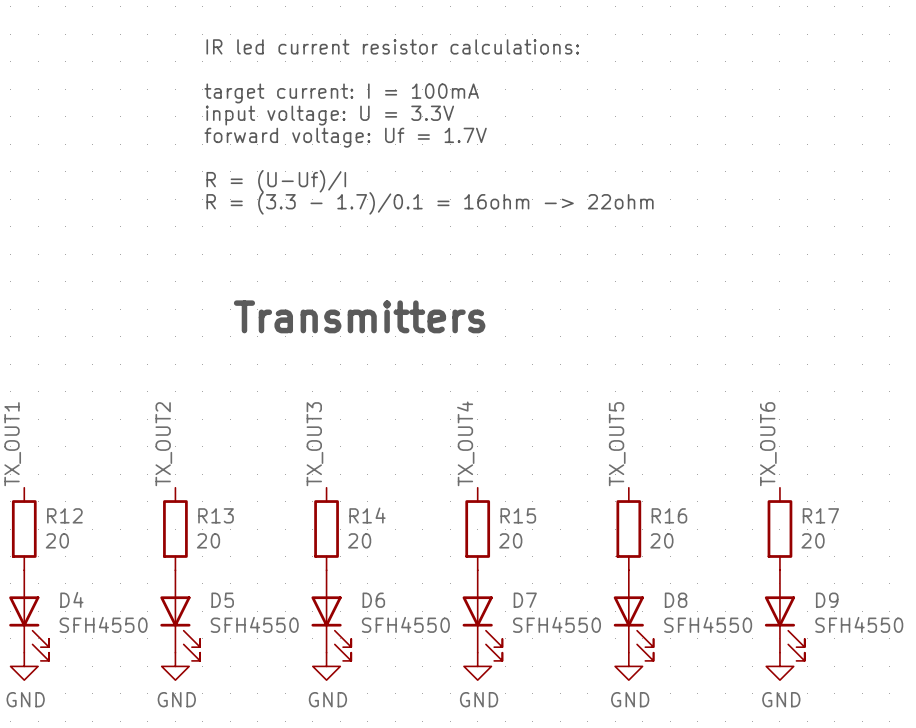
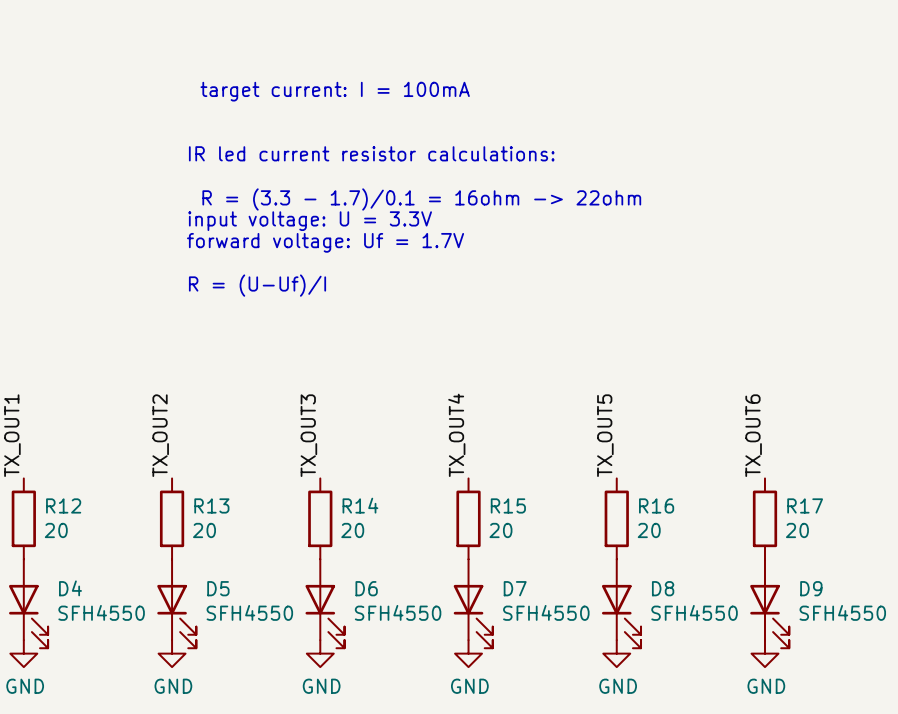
text position: IR led current resistor calculations: (392, 46) -> IR led current resistor calculations: (371, 153)
text position: input voltage: U = 3.3V (329, 115) -> input voltage: U = 3.3V (310, 221)
text position: forward voltage: Uf = 1.7V (345, 137) -> forward voltage: Uf = 1.7V (325, 242)
text position: R = (U-Uf)/I (276, 181) -> R = (U-Uf)/I (257, 285)
text: Transmitters (359, 316) -> none

